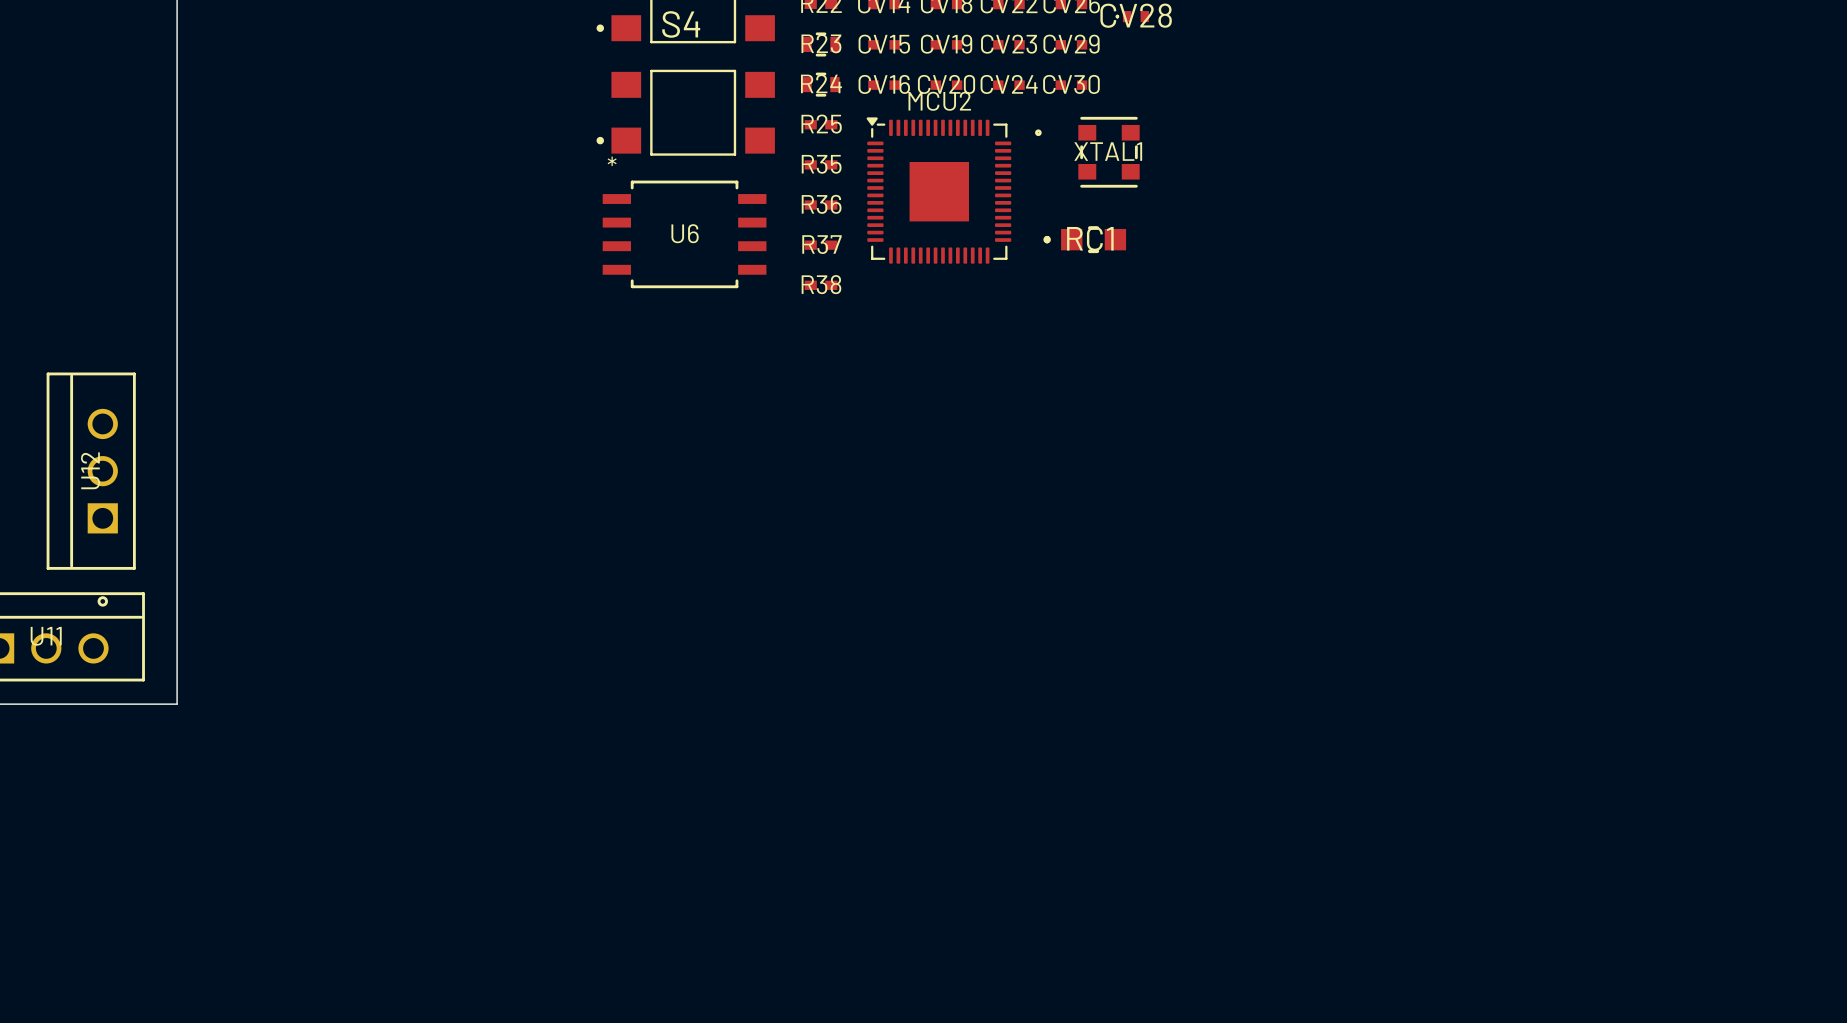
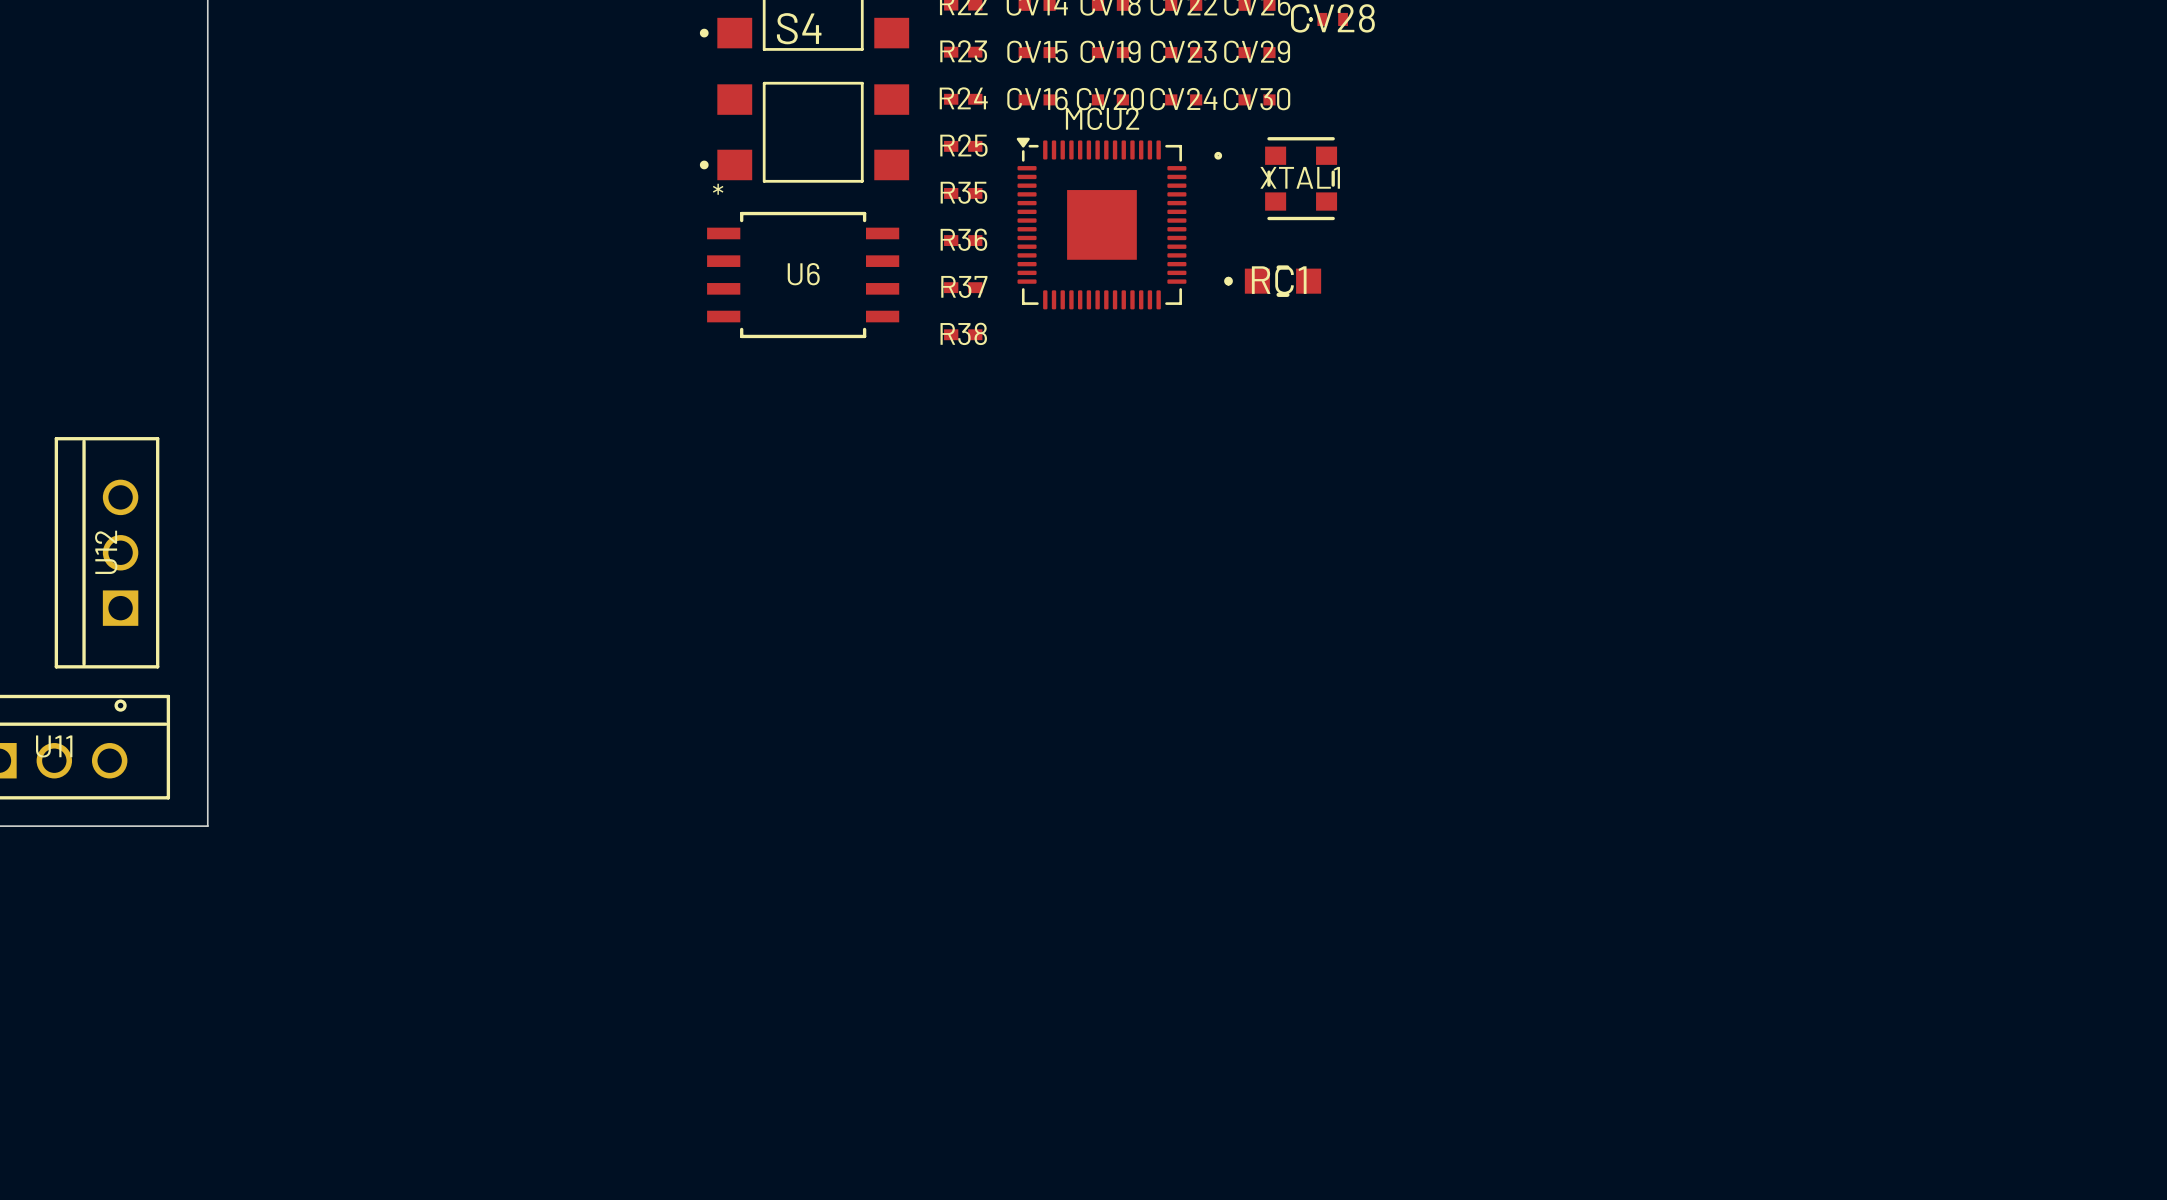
R23 footprint: [802, 32, 840, 57] -> [944, 46, 983, 58]
R24 footprint: [802, 72, 840, 97] -> [944, 93, 983, 105]

